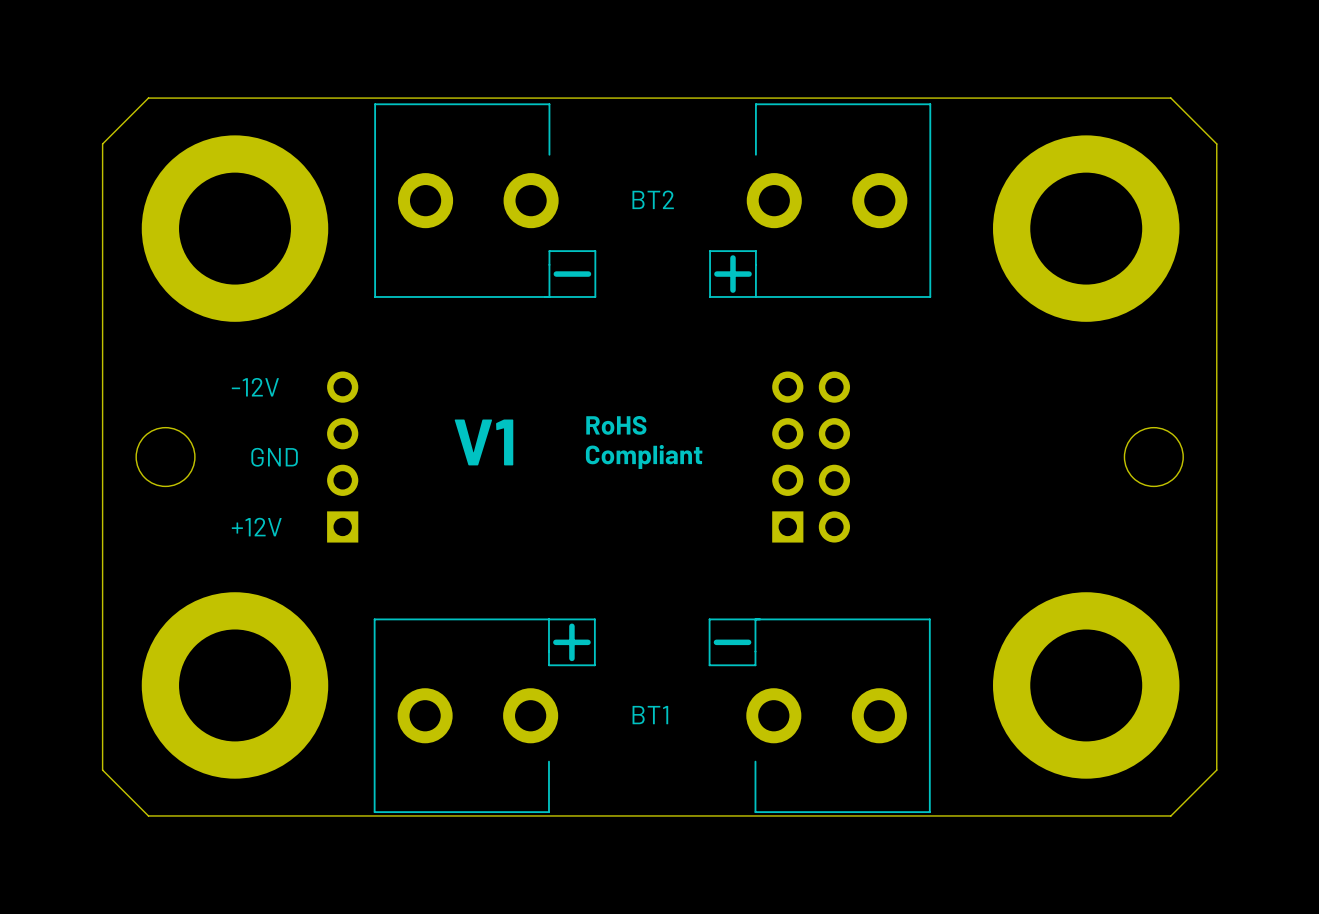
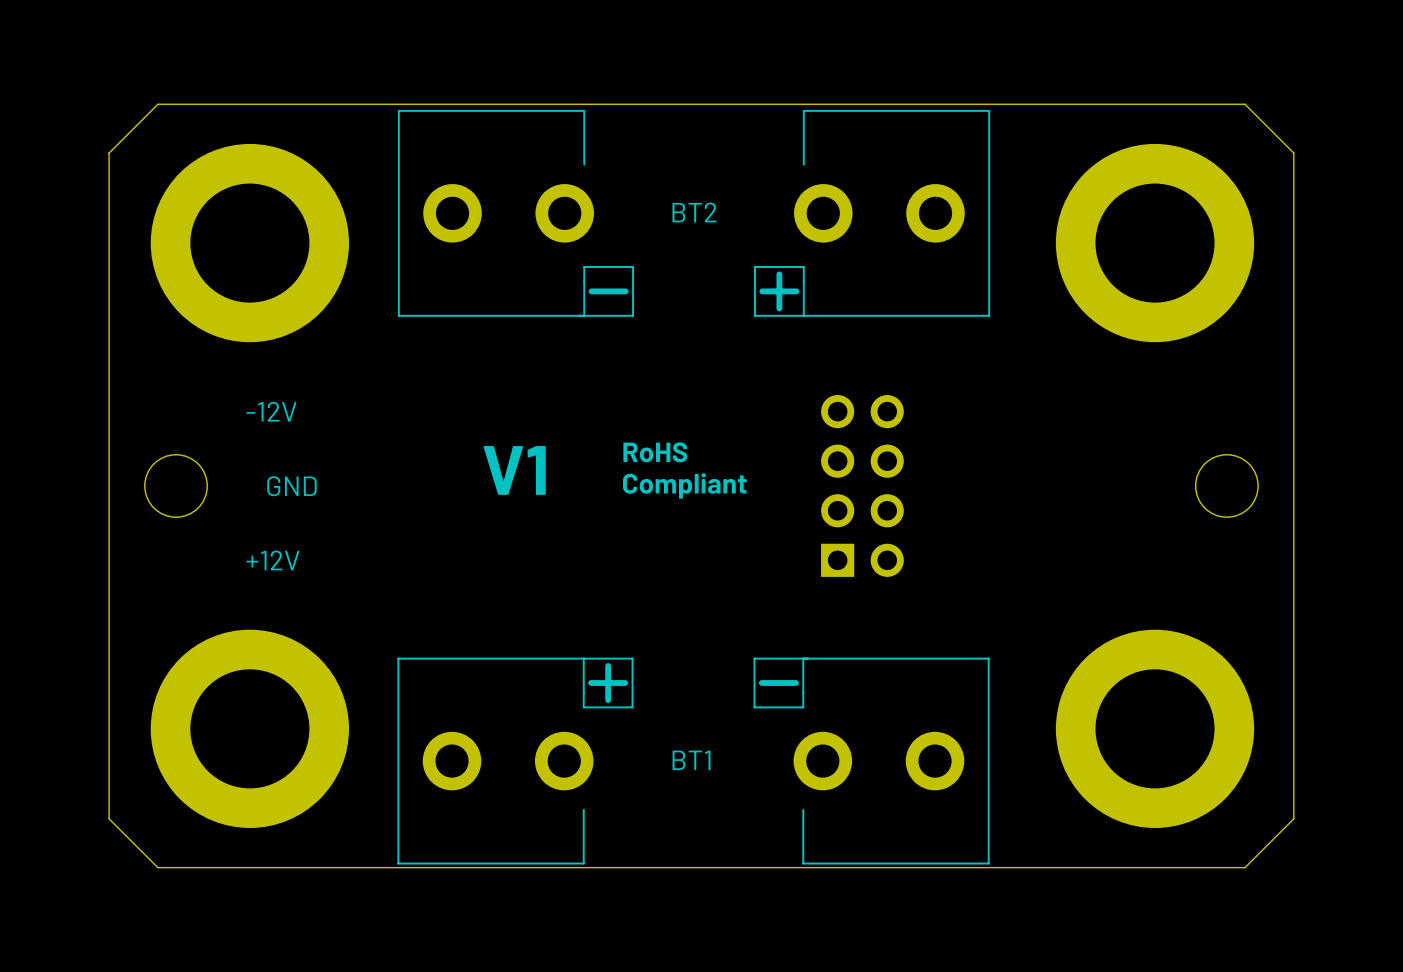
part: (342, 457) -> none

